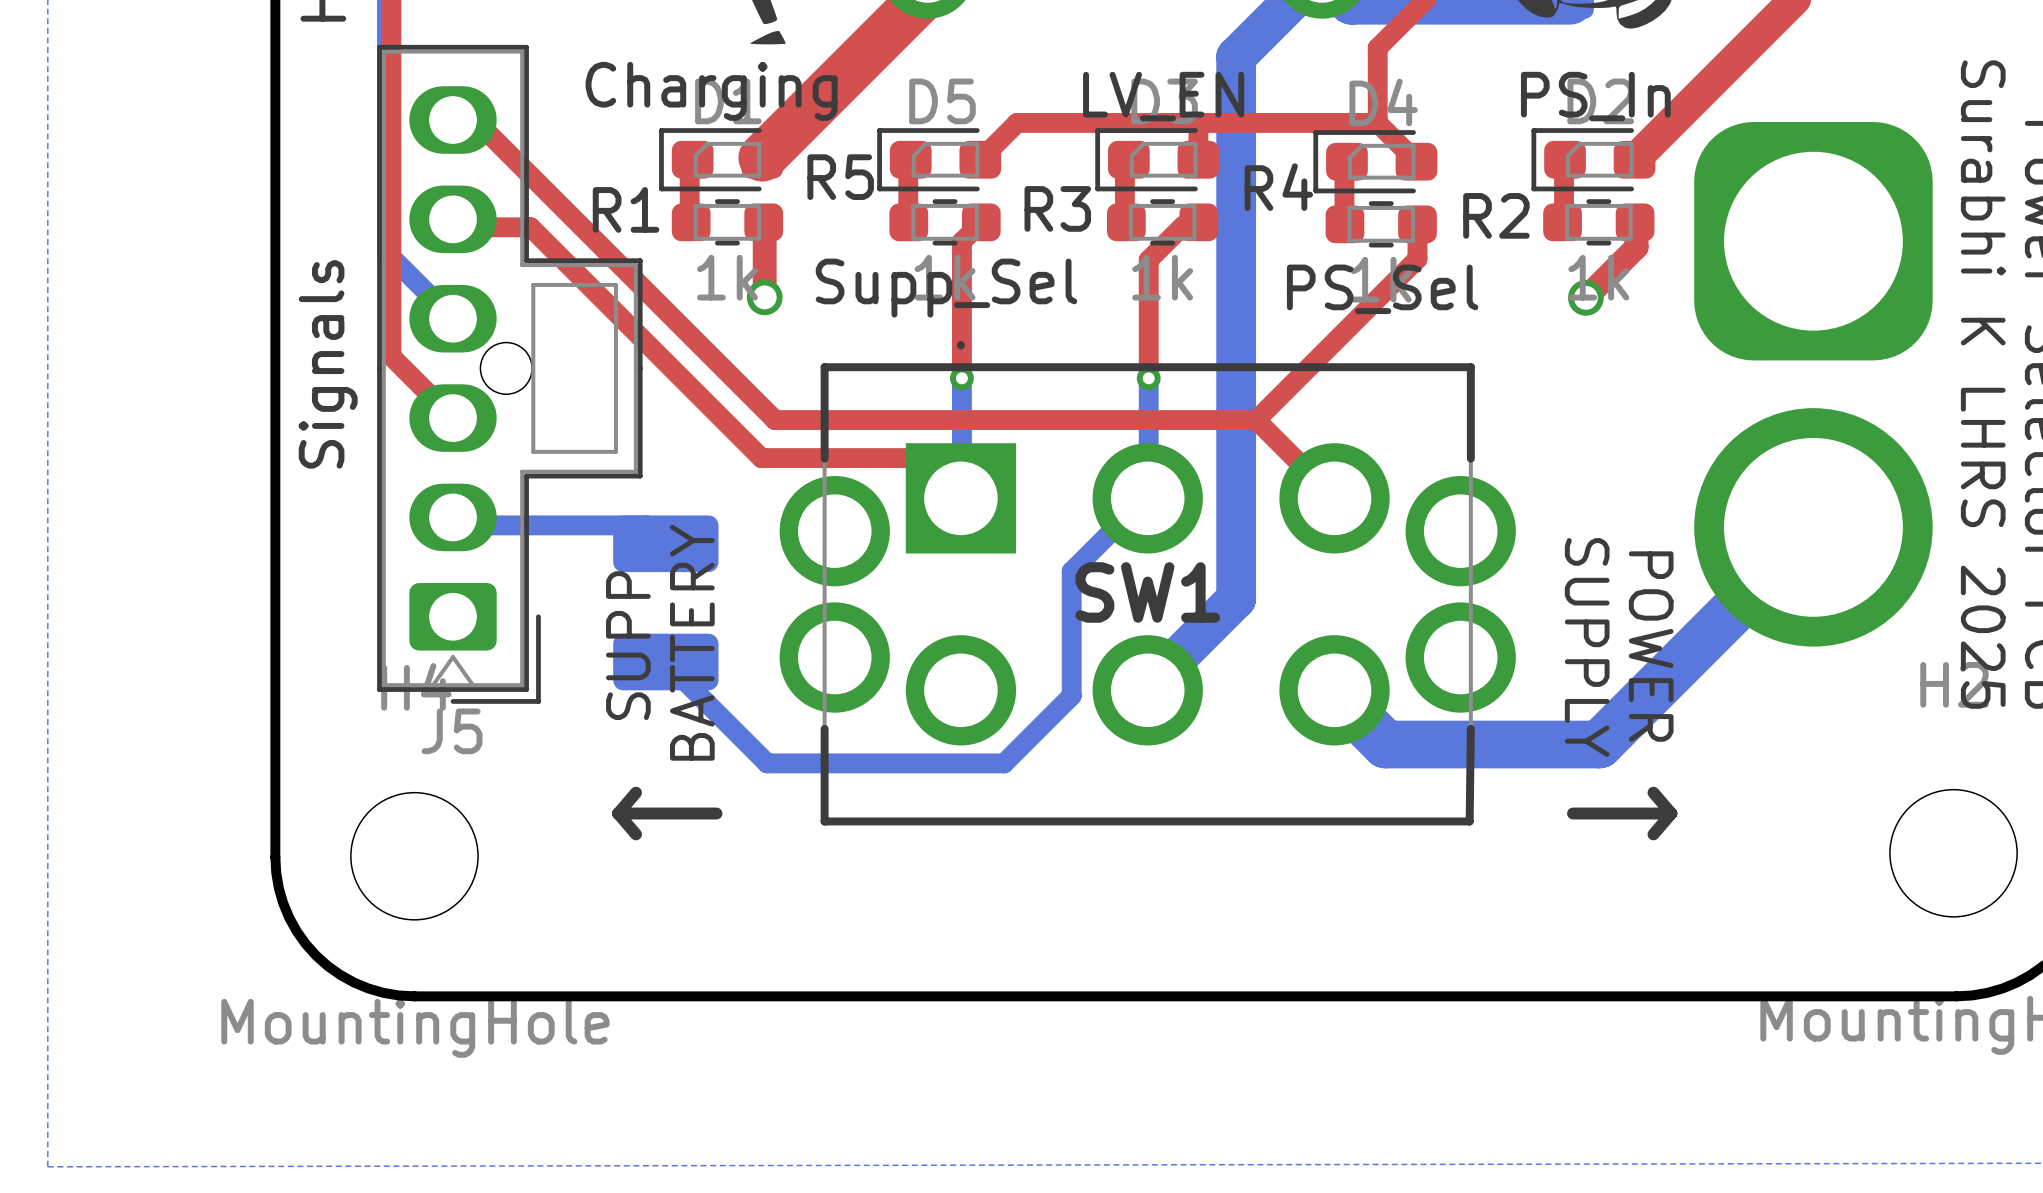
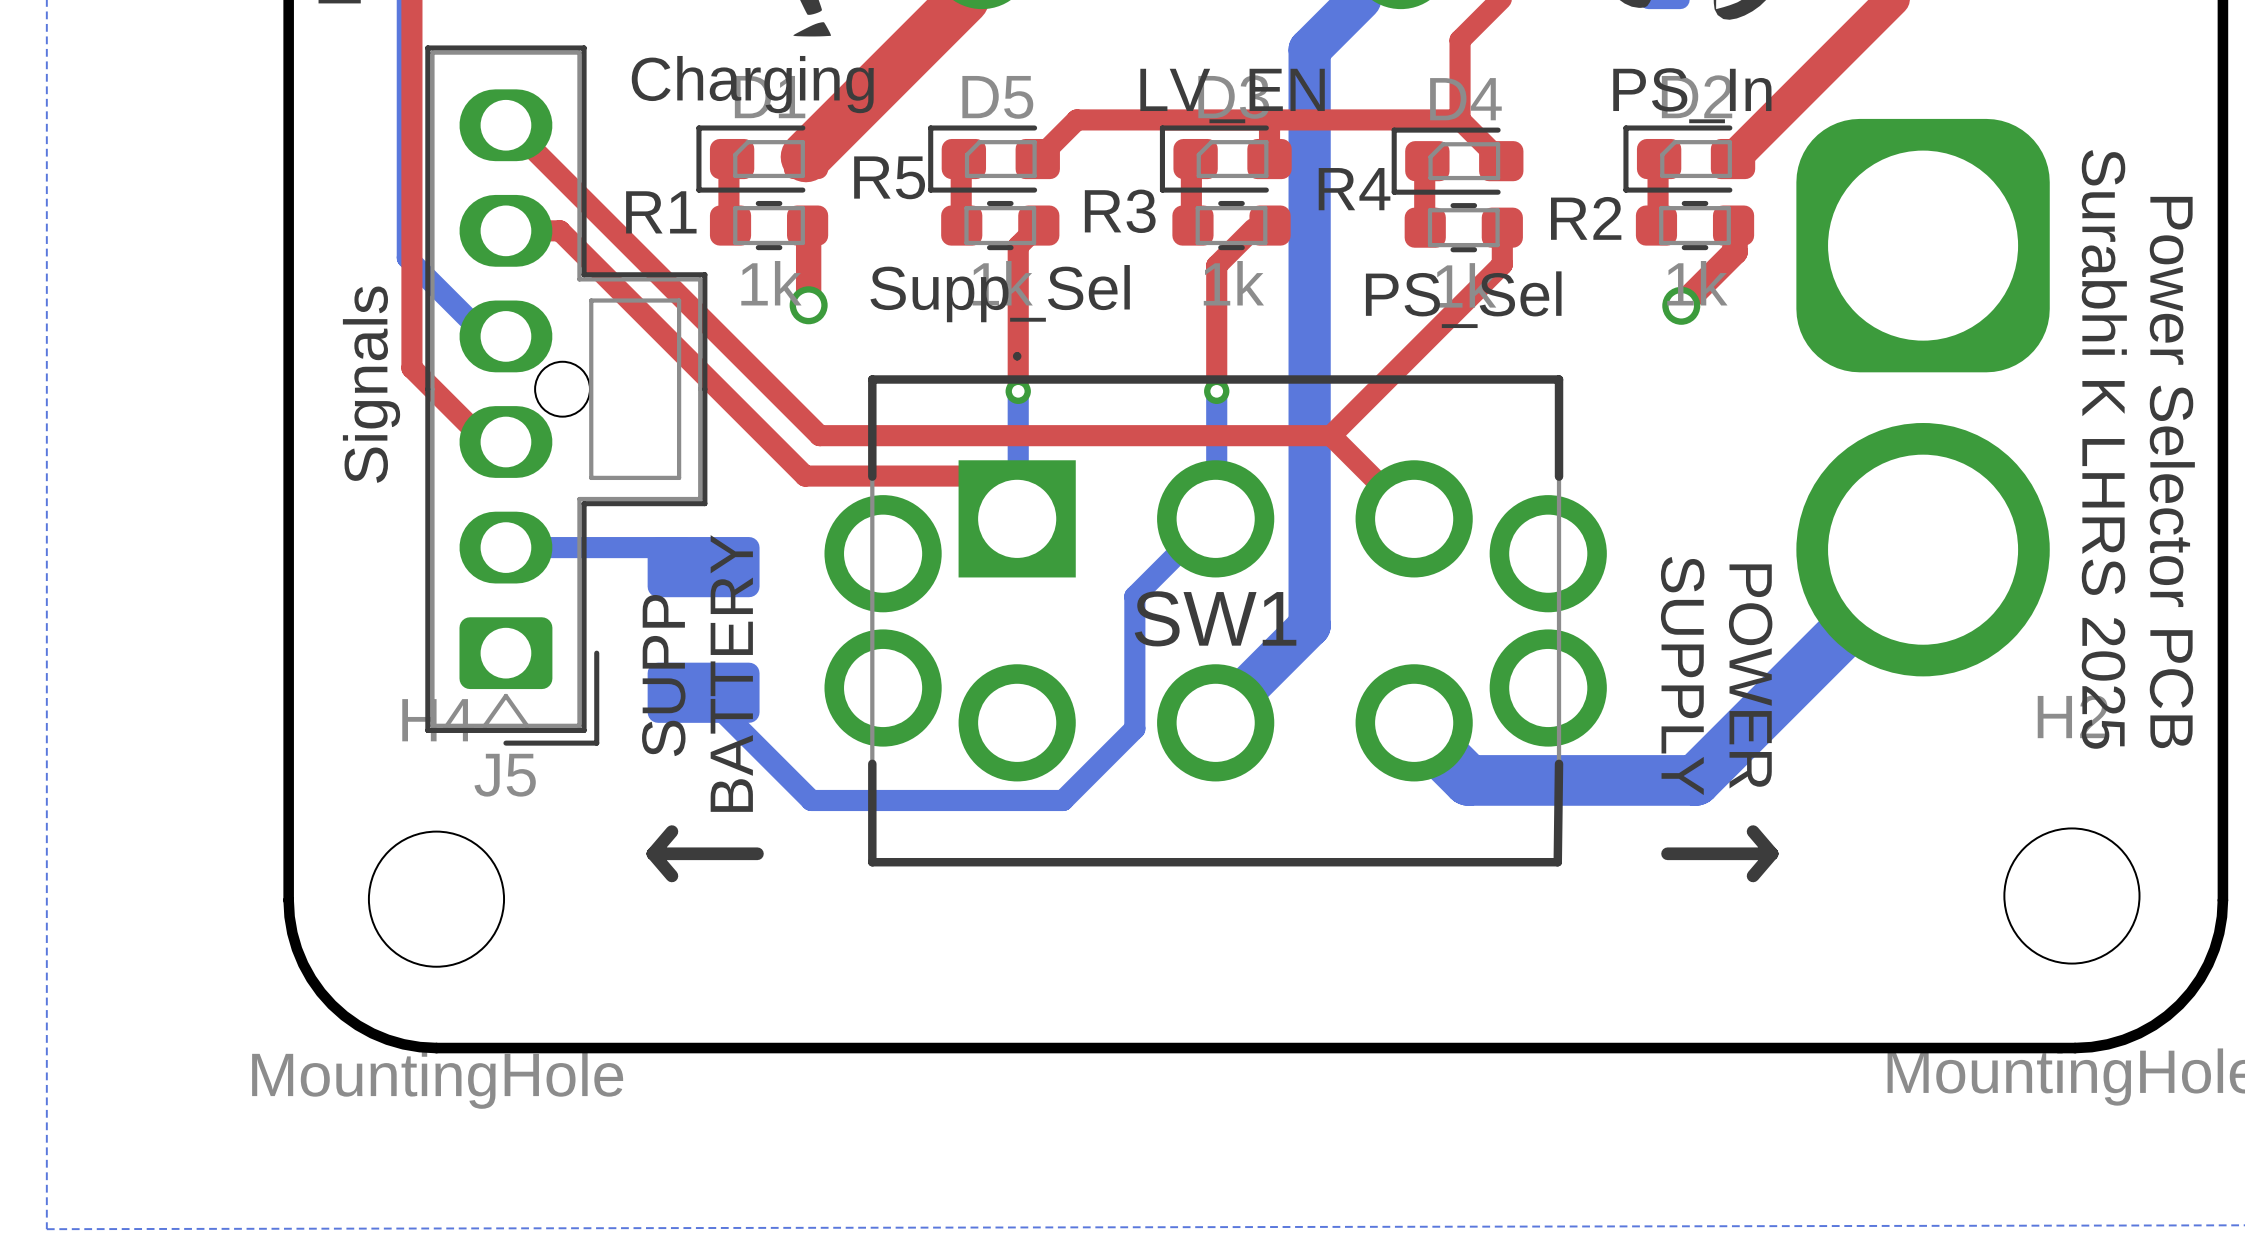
J5 position: (509, 374) -> (566, 395)

